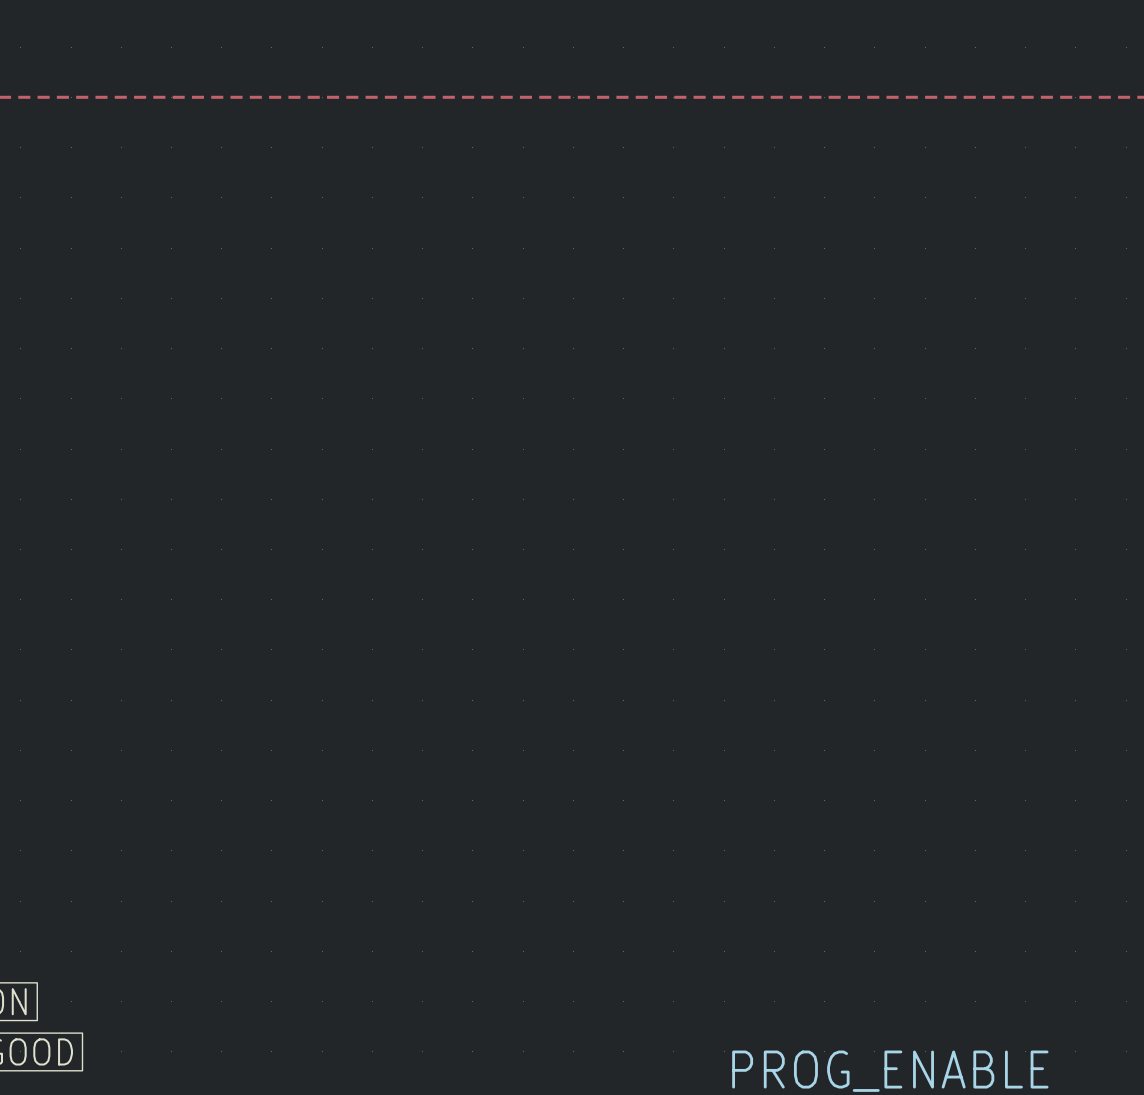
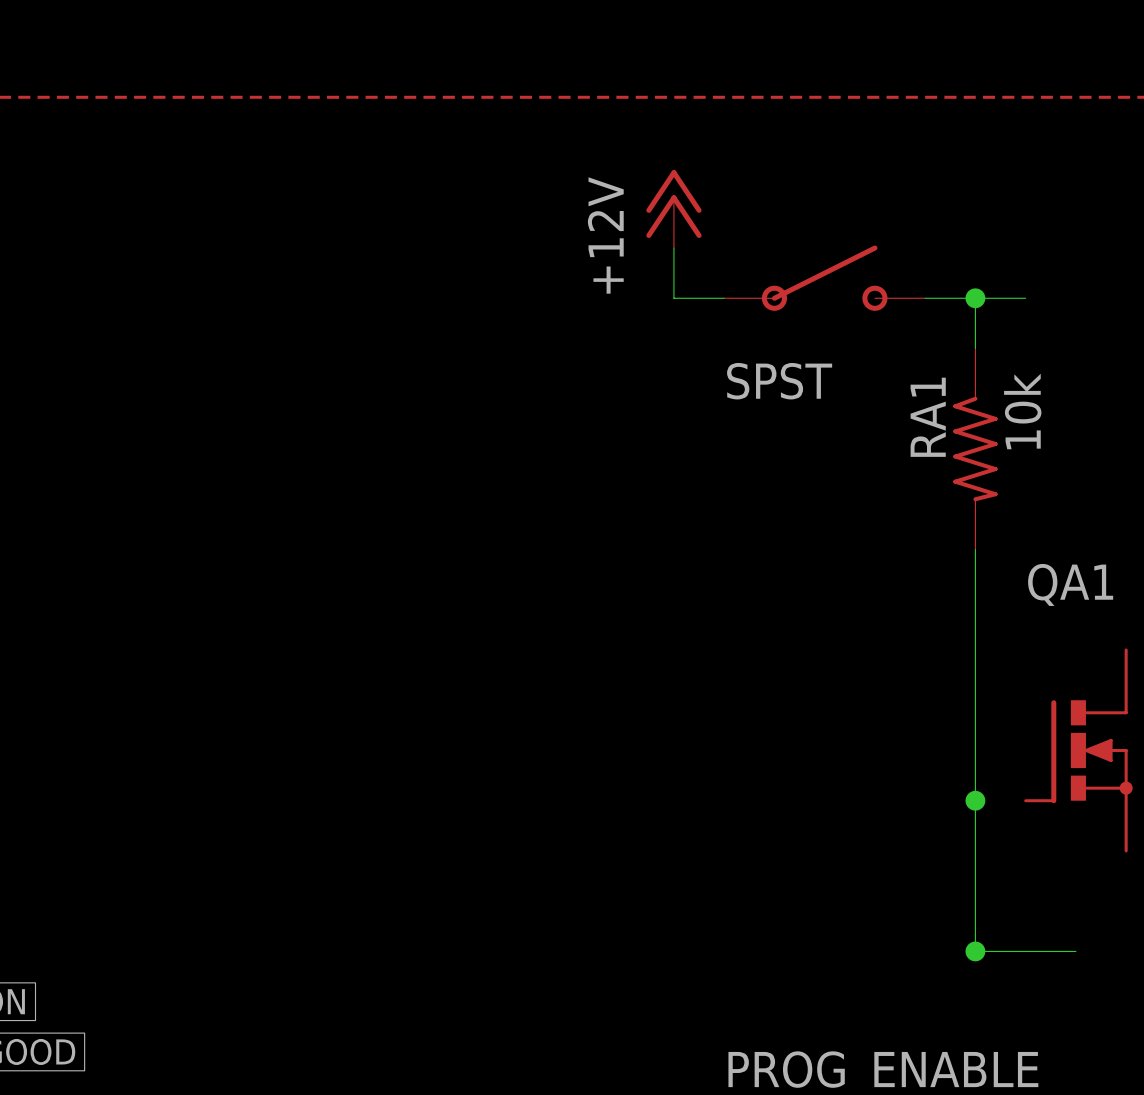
power symbol: none -> +12V (673, 209)
wire: none -> (673, 248) (673, 298) (724, 298)
part: none -> SPST (824, 278)
wire: none -> (925, 298) (1025, 298)
wire: none -> (975, 298) (975, 348)
junction: none -> (975, 298)
RA1: none -> 10k (975, 449)
wire: none -> (975, 549) (975, 951) (1075, 951)
QA1: none -> (1078, 750)
junction: none -> (975, 800)
junction: none -> (975, 951)

